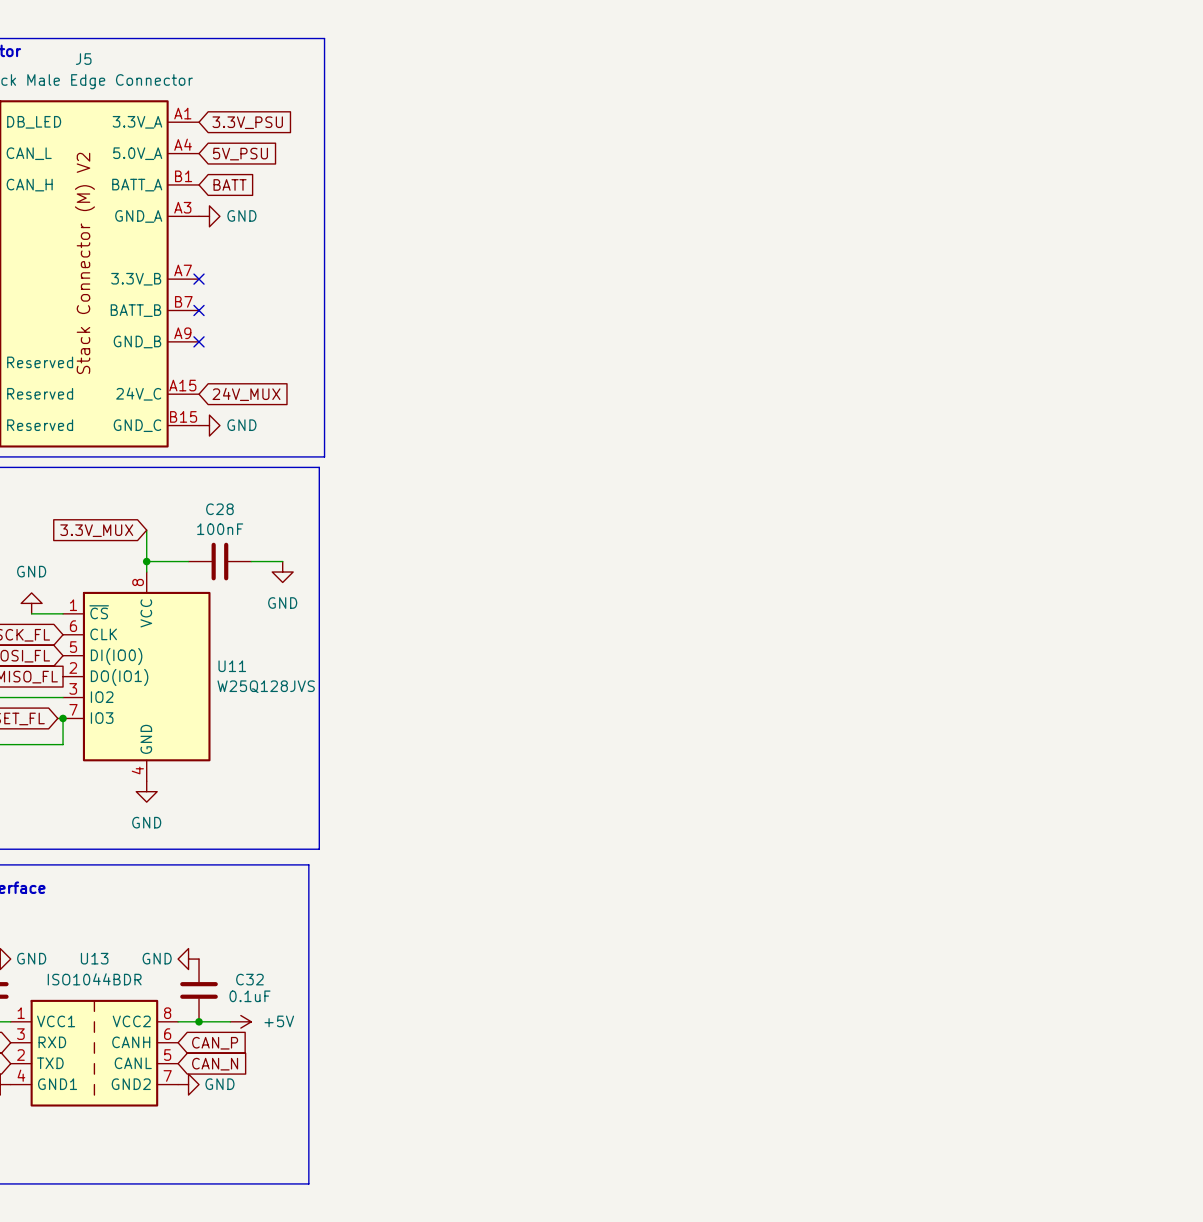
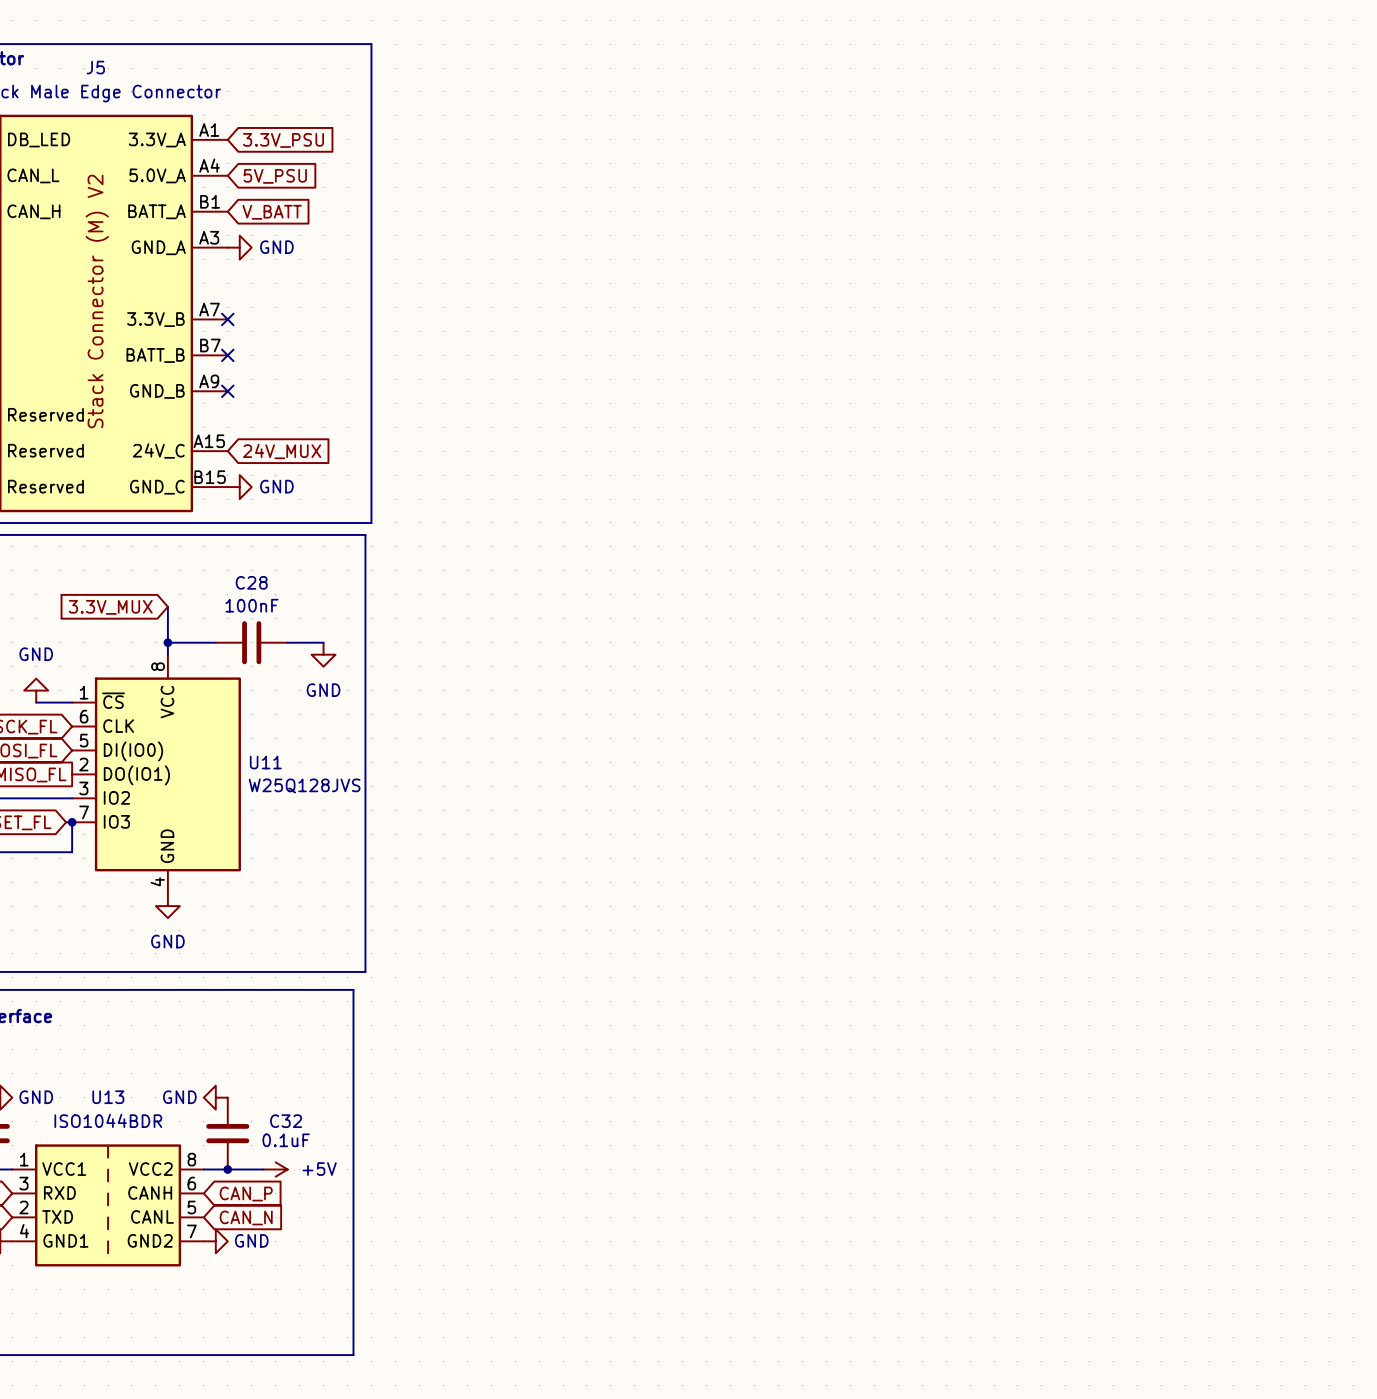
global label: BATT (230, 184) -> V_BATT (272, 212)

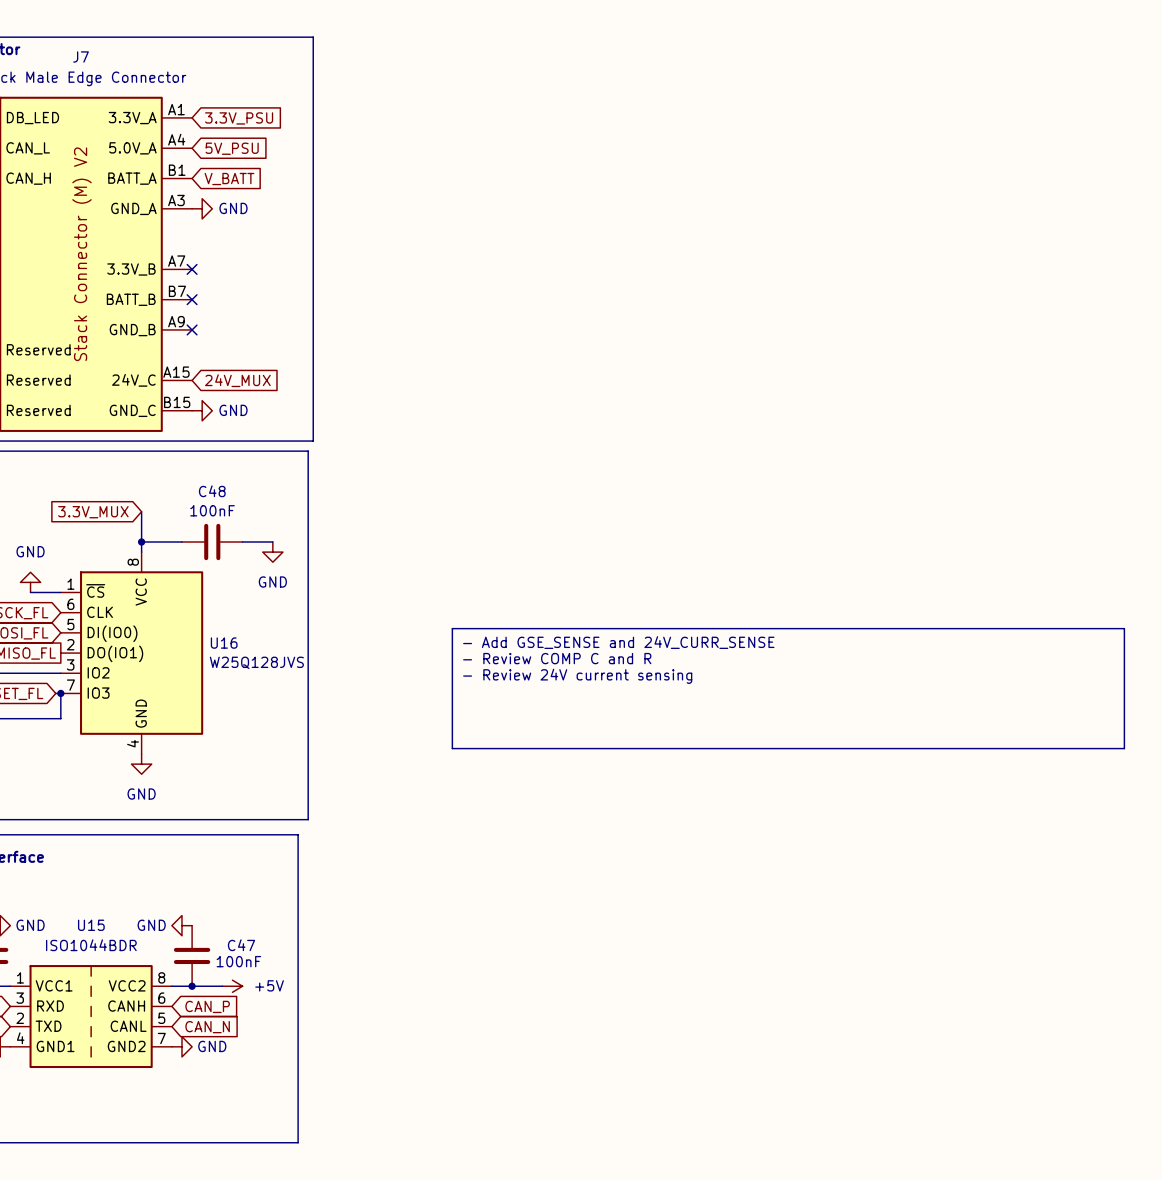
J5 name: J5 (95, 67) -> J7 (81, 56)
C28 name: C28 (251, 582) -> C48 (212, 491)
line: none -> (452, 628) (1124, 628) (1124, 748) (452, 748) (452, 628)
text: none -> - Add GSE_SENSE and 24V_CURR_SENSE (618, 642)
U11 name: U11 (265, 762) -> U16 (224, 643)
text: none -> - Review COMP C and R (557, 658)
text: none -> - Review 24V current sensing (577, 676)
U13 name: U13 (108, 1097) -> U15 (91, 925)
C32 name: C32 (286, 1121) -> C47 (241, 945)
C32 value: 0.1uF (286, 1140) -> 100nF (238, 961)

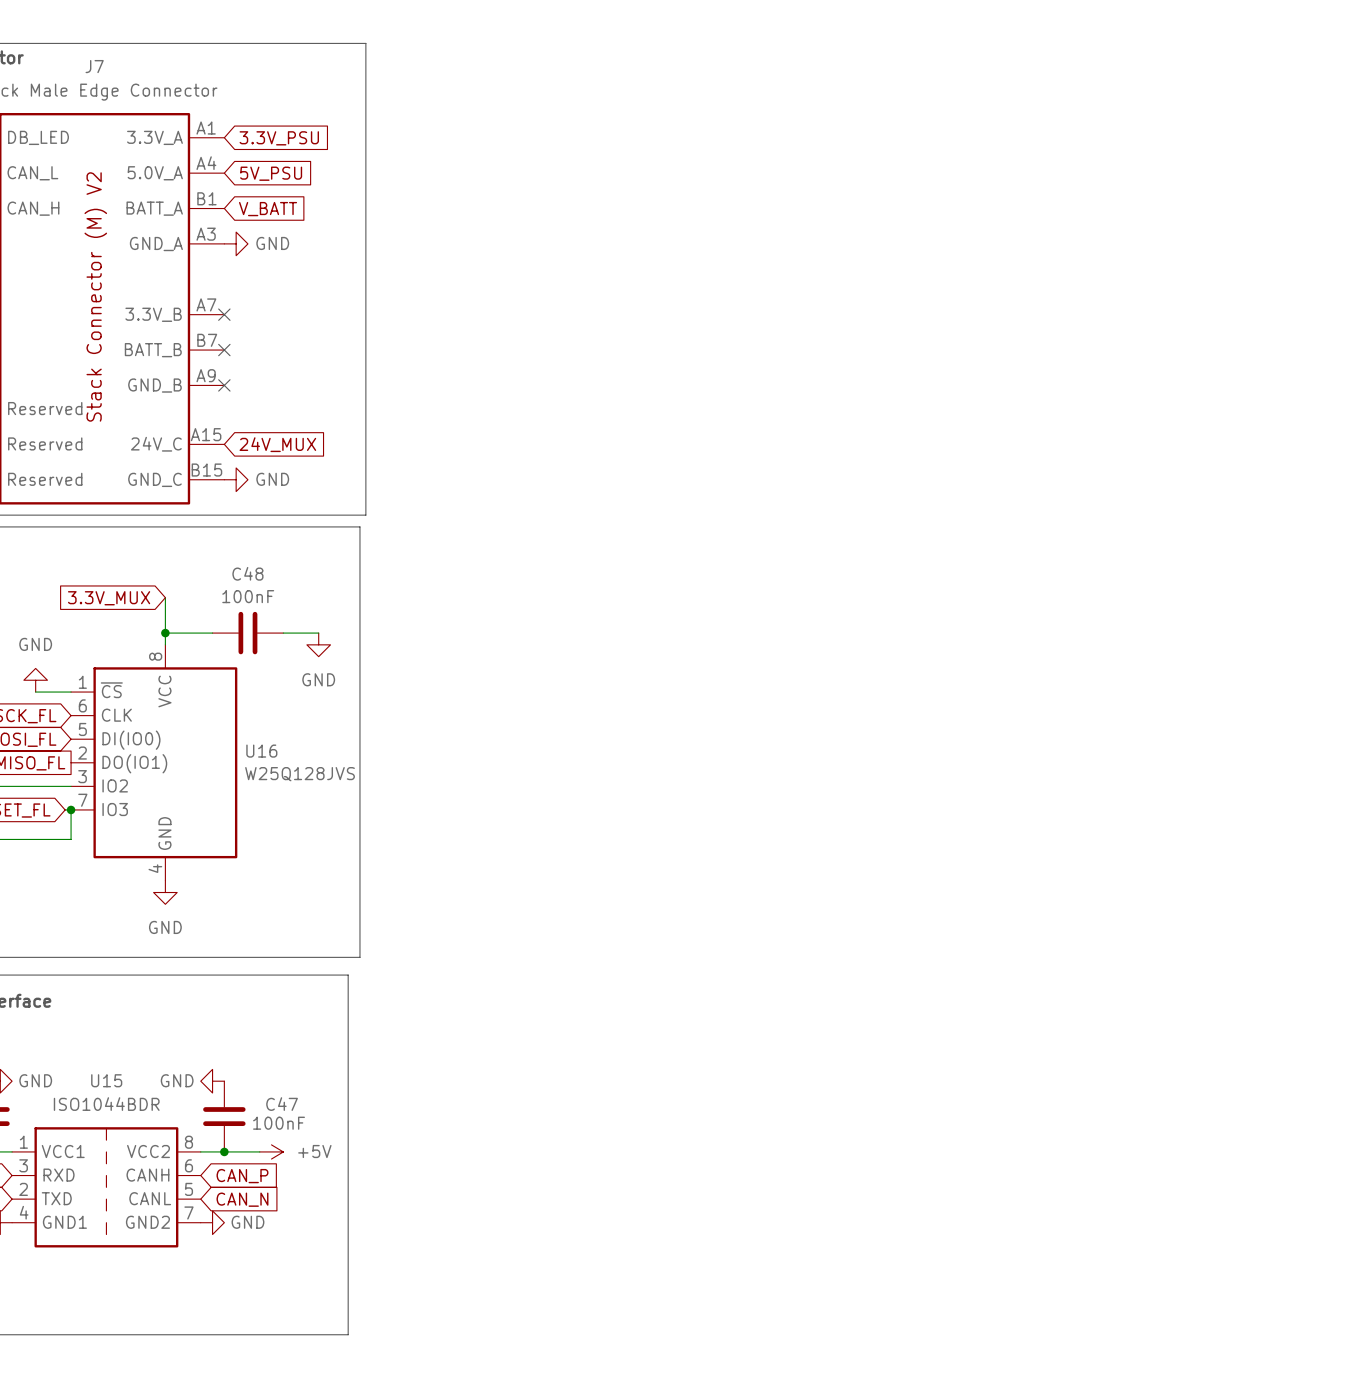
line: (452, 628) (1124, 628) (1124, 748) (452, 748) (452, 628) -> none
text: - Add GSE_SENSE and 24V_CURR_SENSE (618, 642) -> none
text: - Review COMP C and R (557, 658) -> none
text: - Review 24V current sensing (577, 676) -> none

